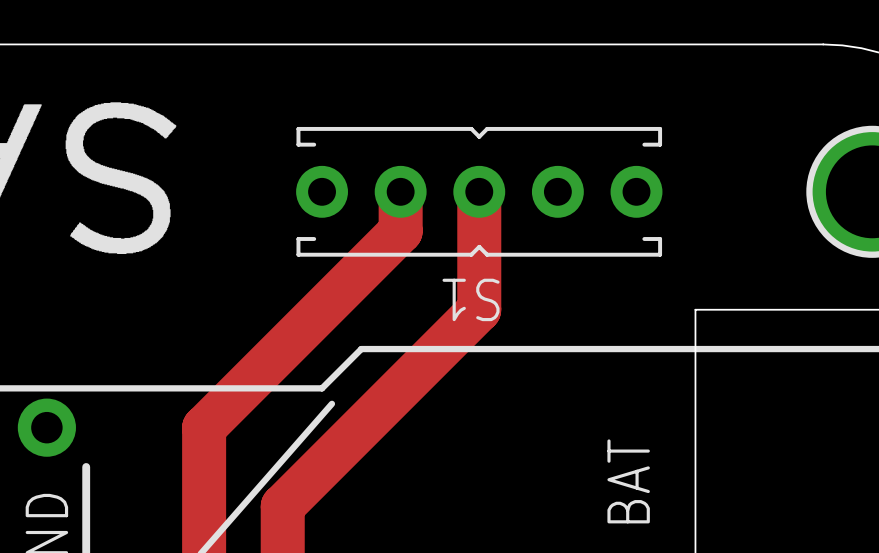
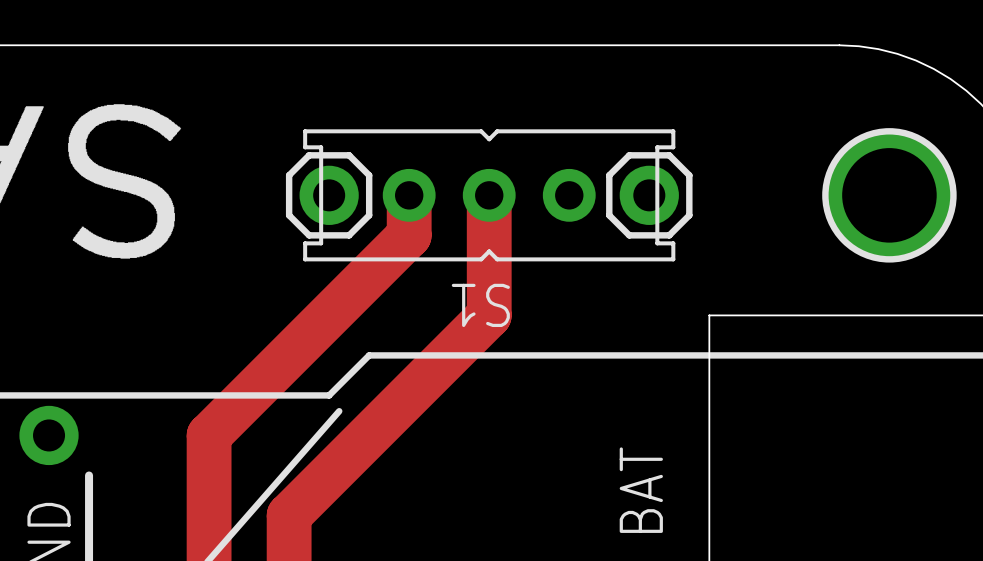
S1 footprint: [296, 126, 663, 257] -> [303, 129, 676, 262]
part: none -> (329, 195)
part: none -> (649, 195)

